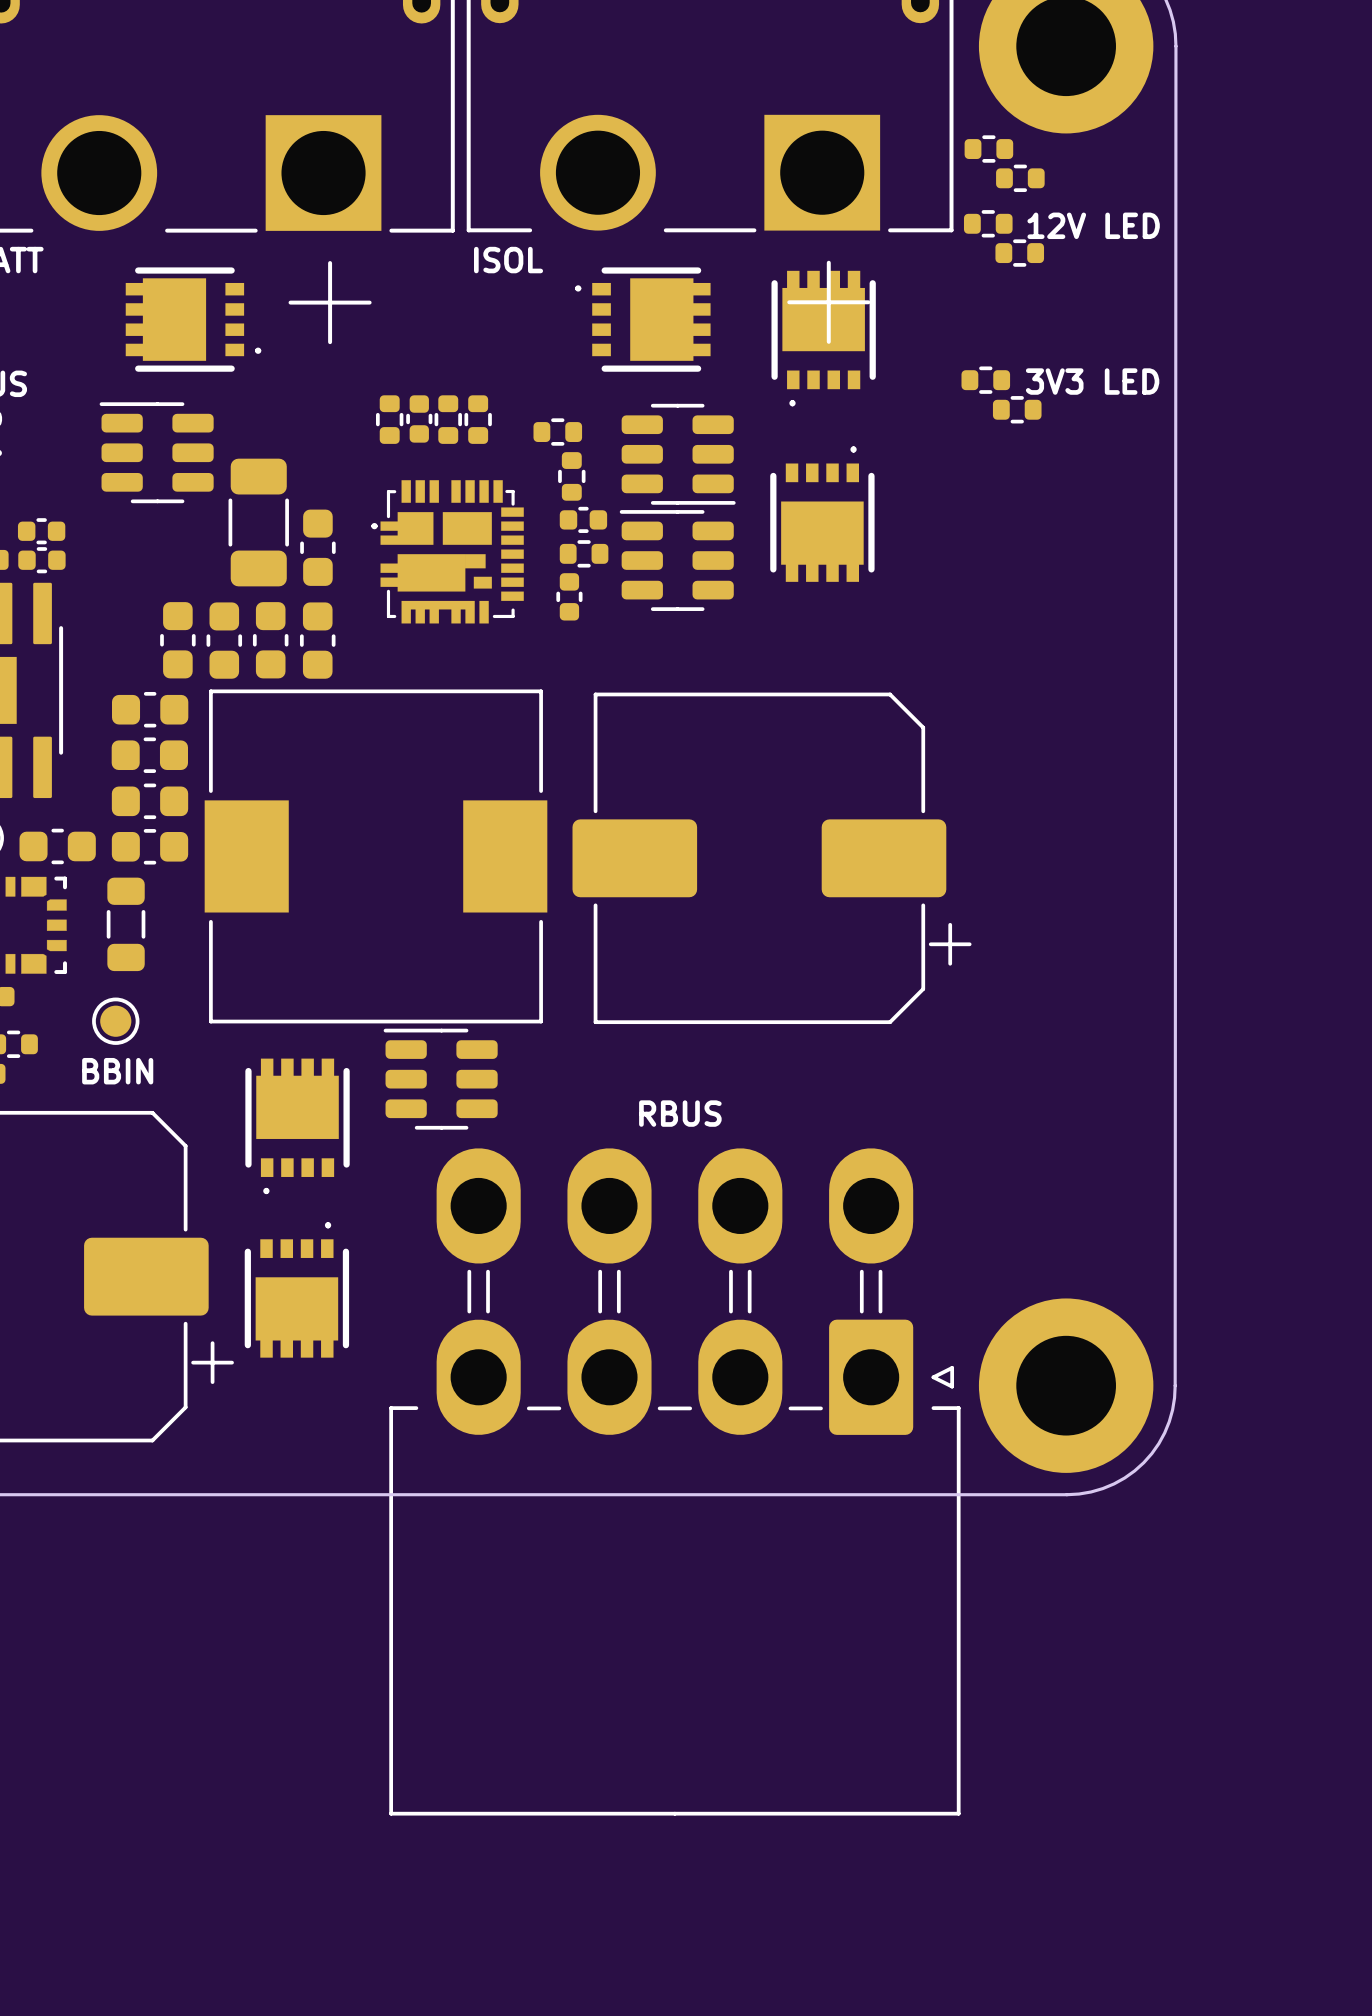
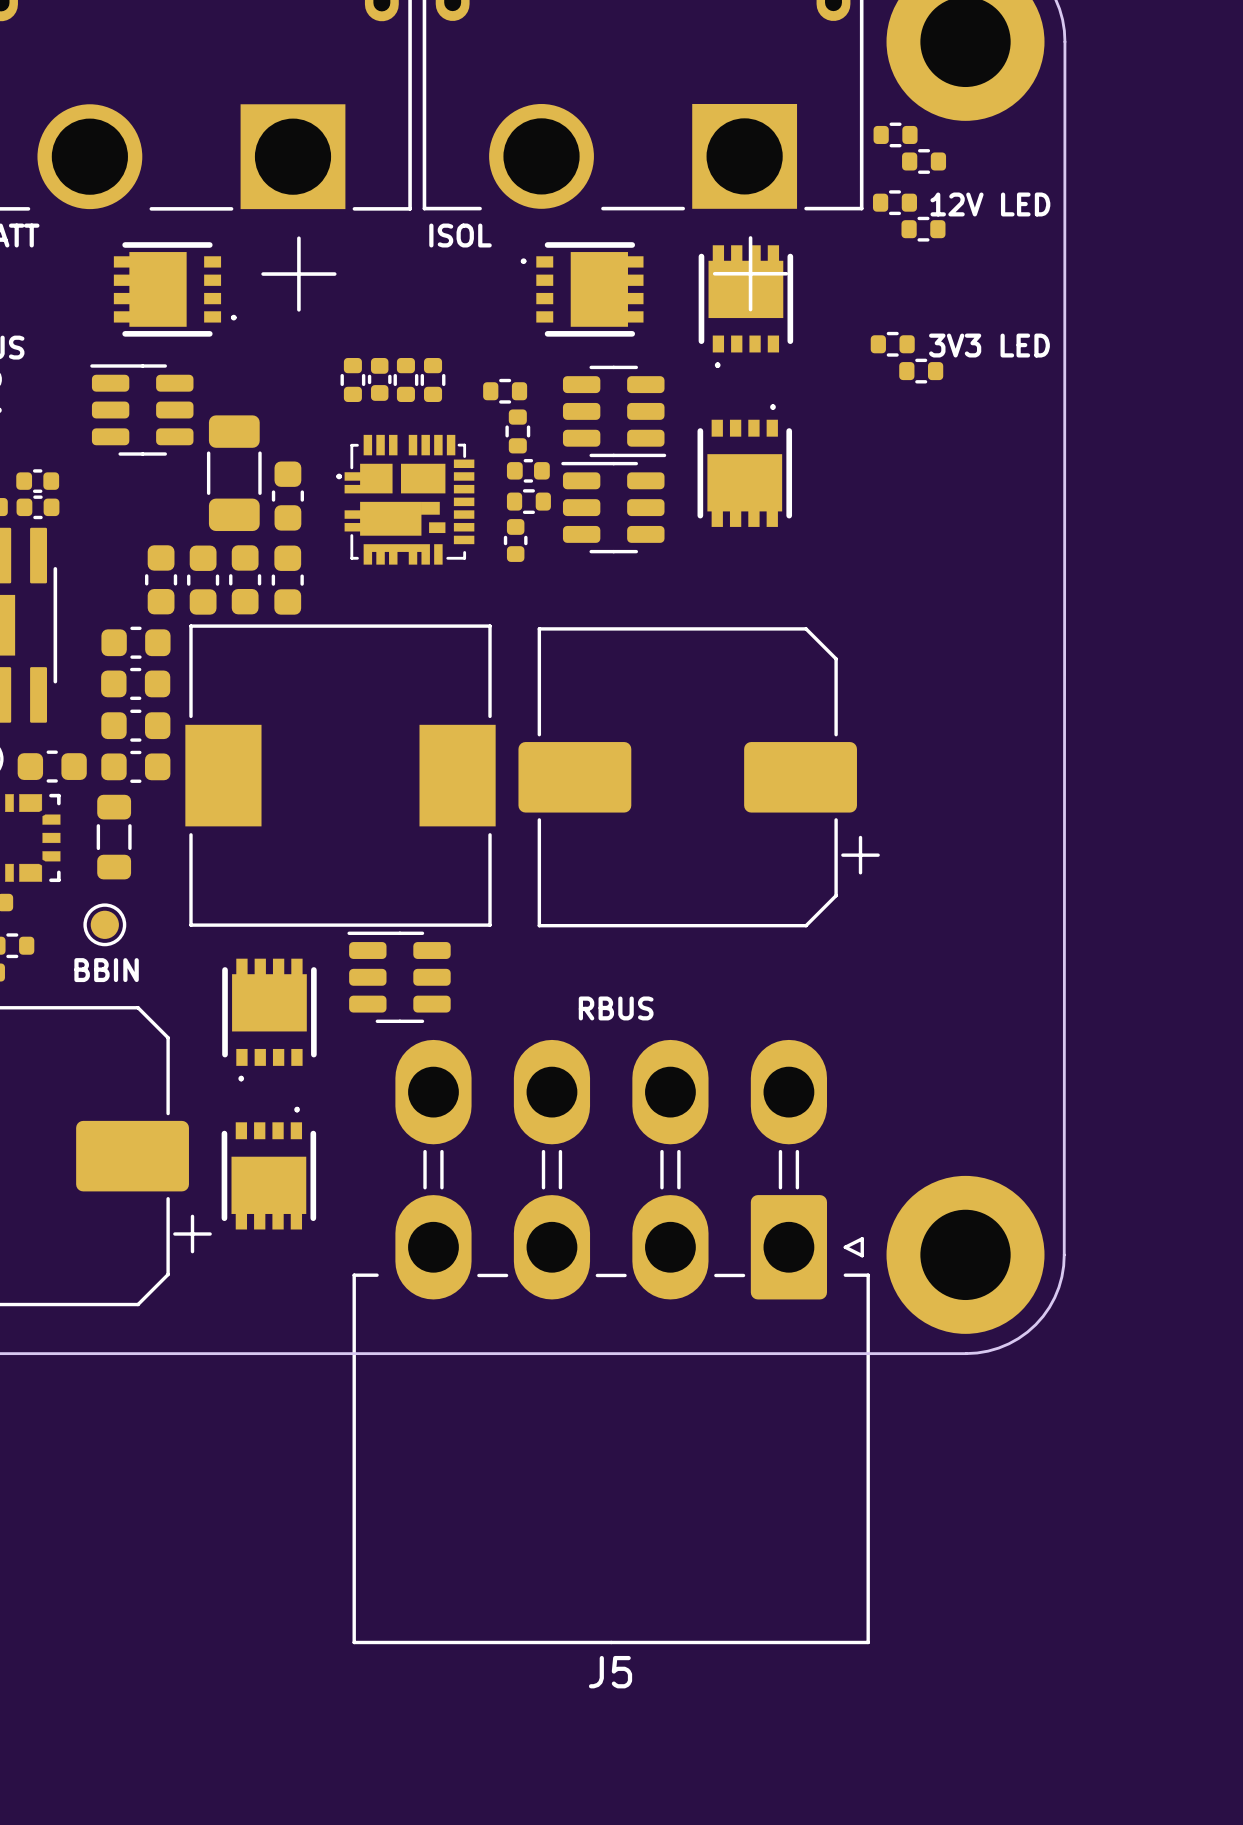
J5 name: none -> J5 (610, 1672)

